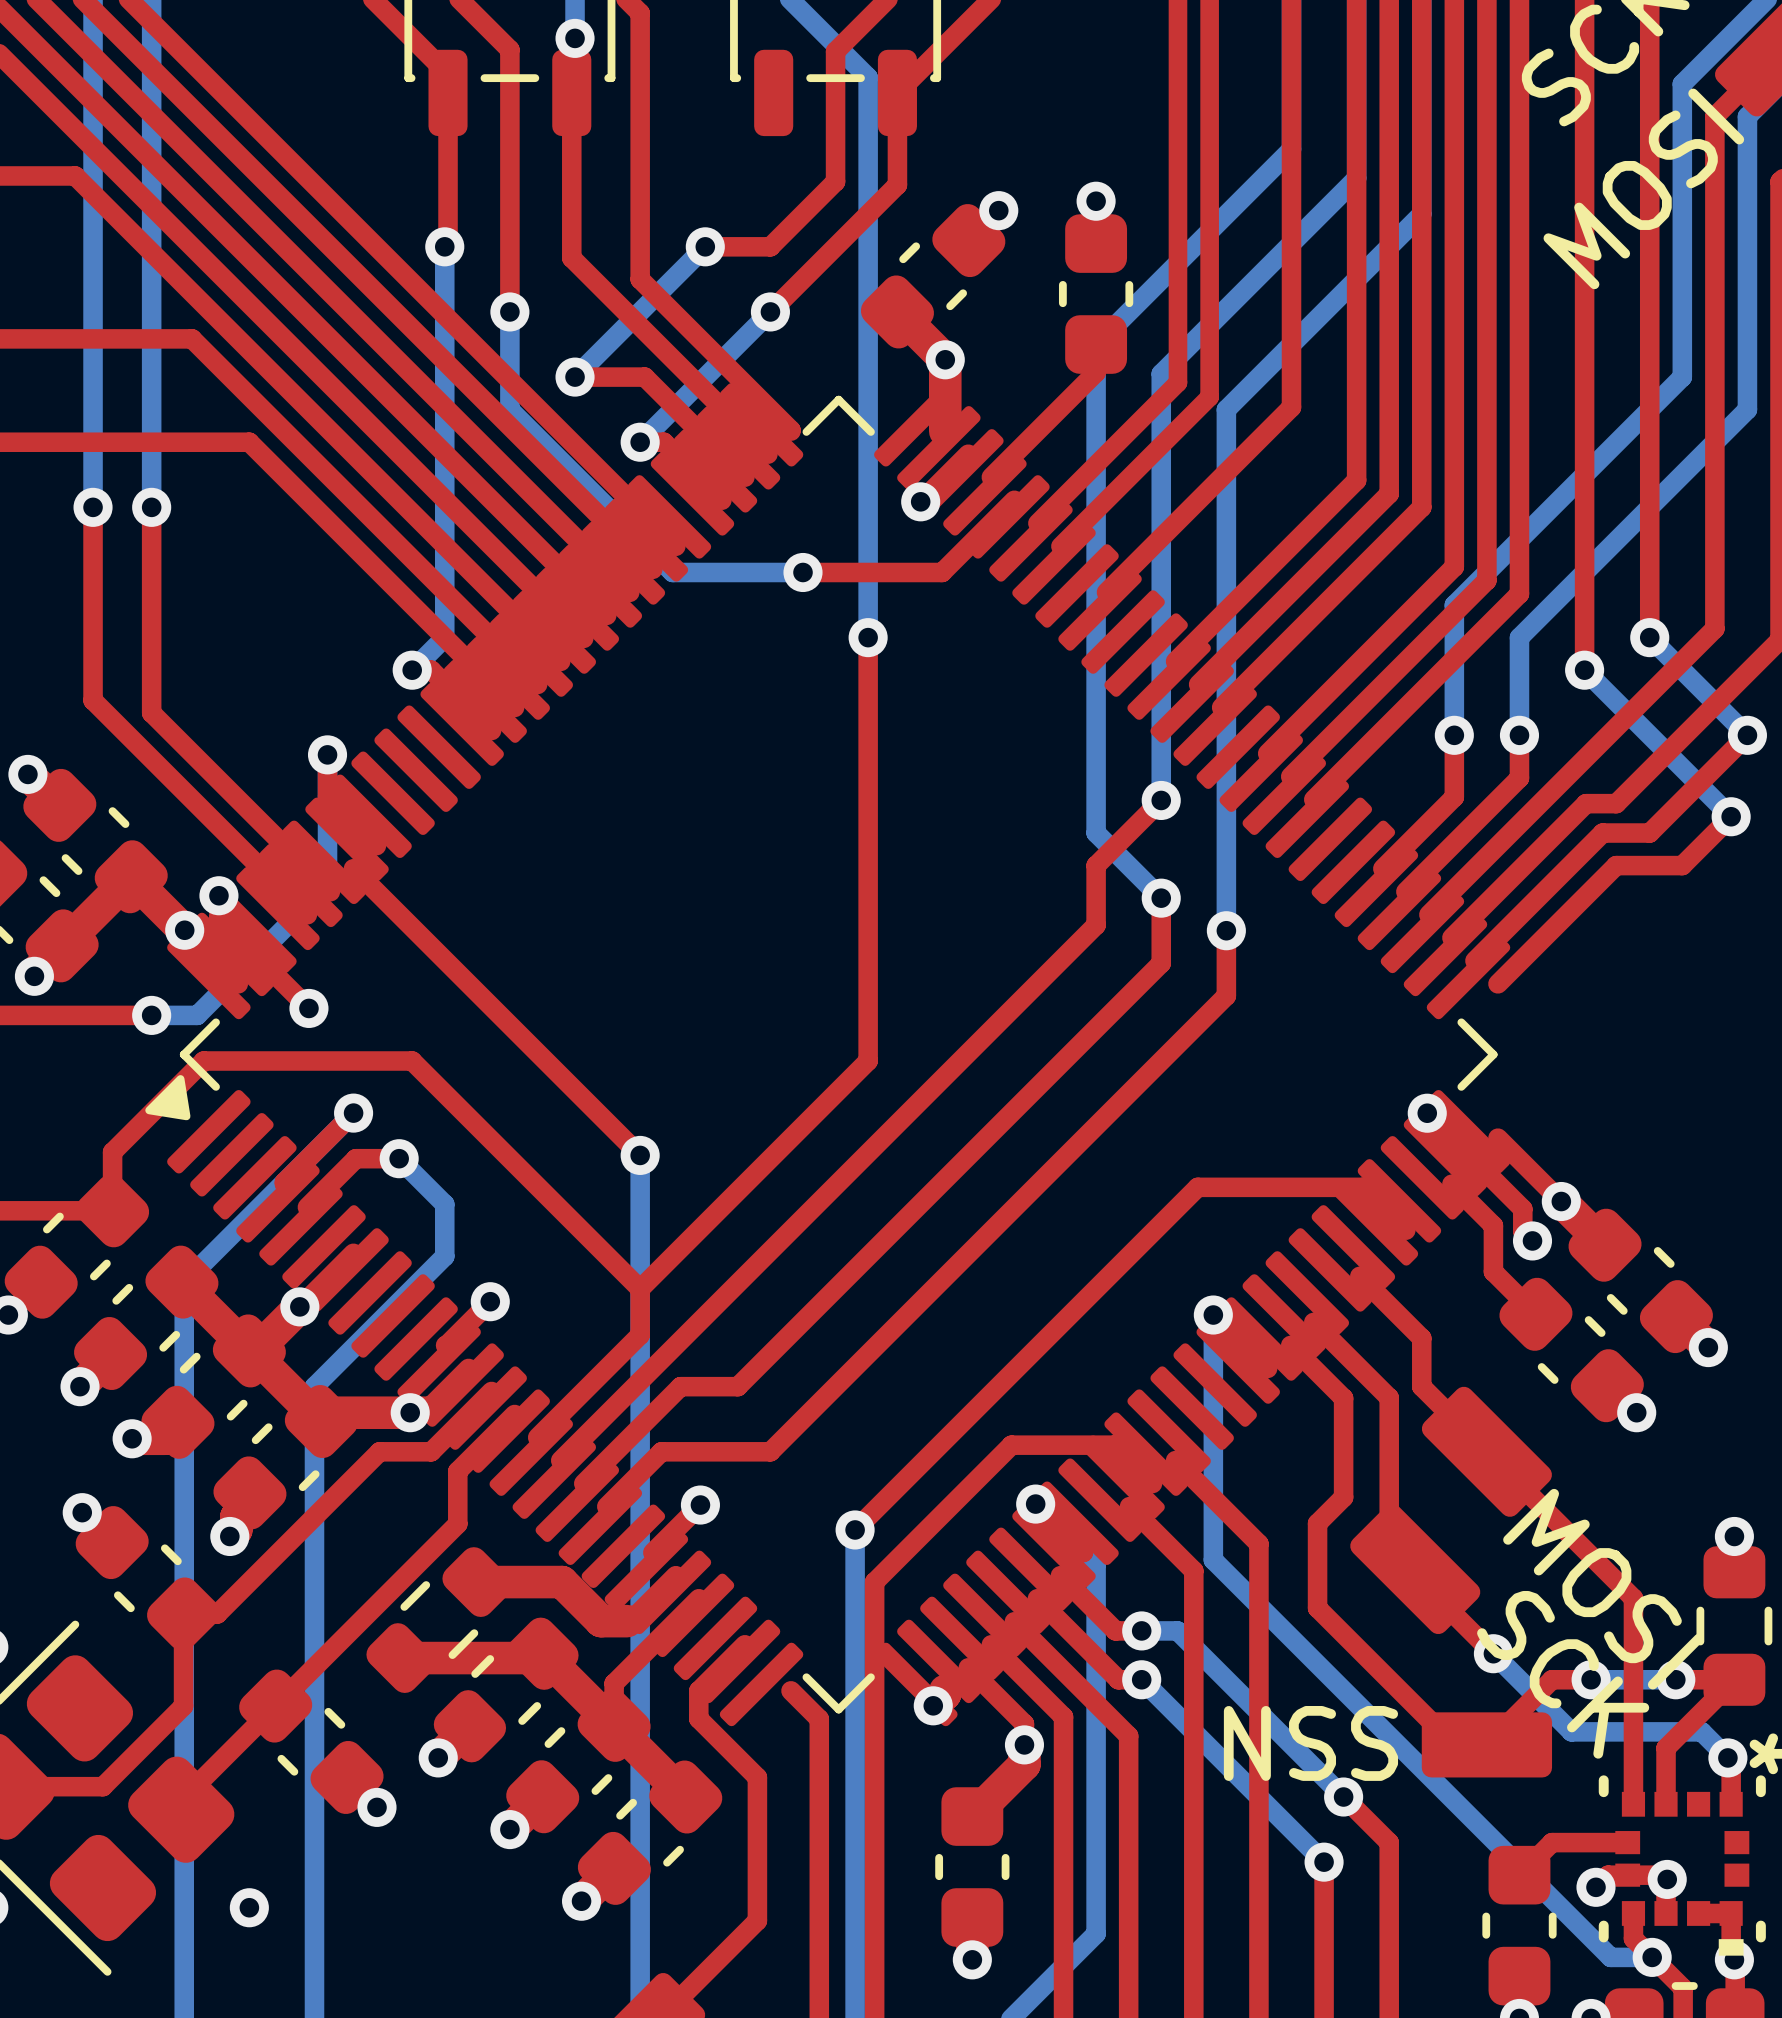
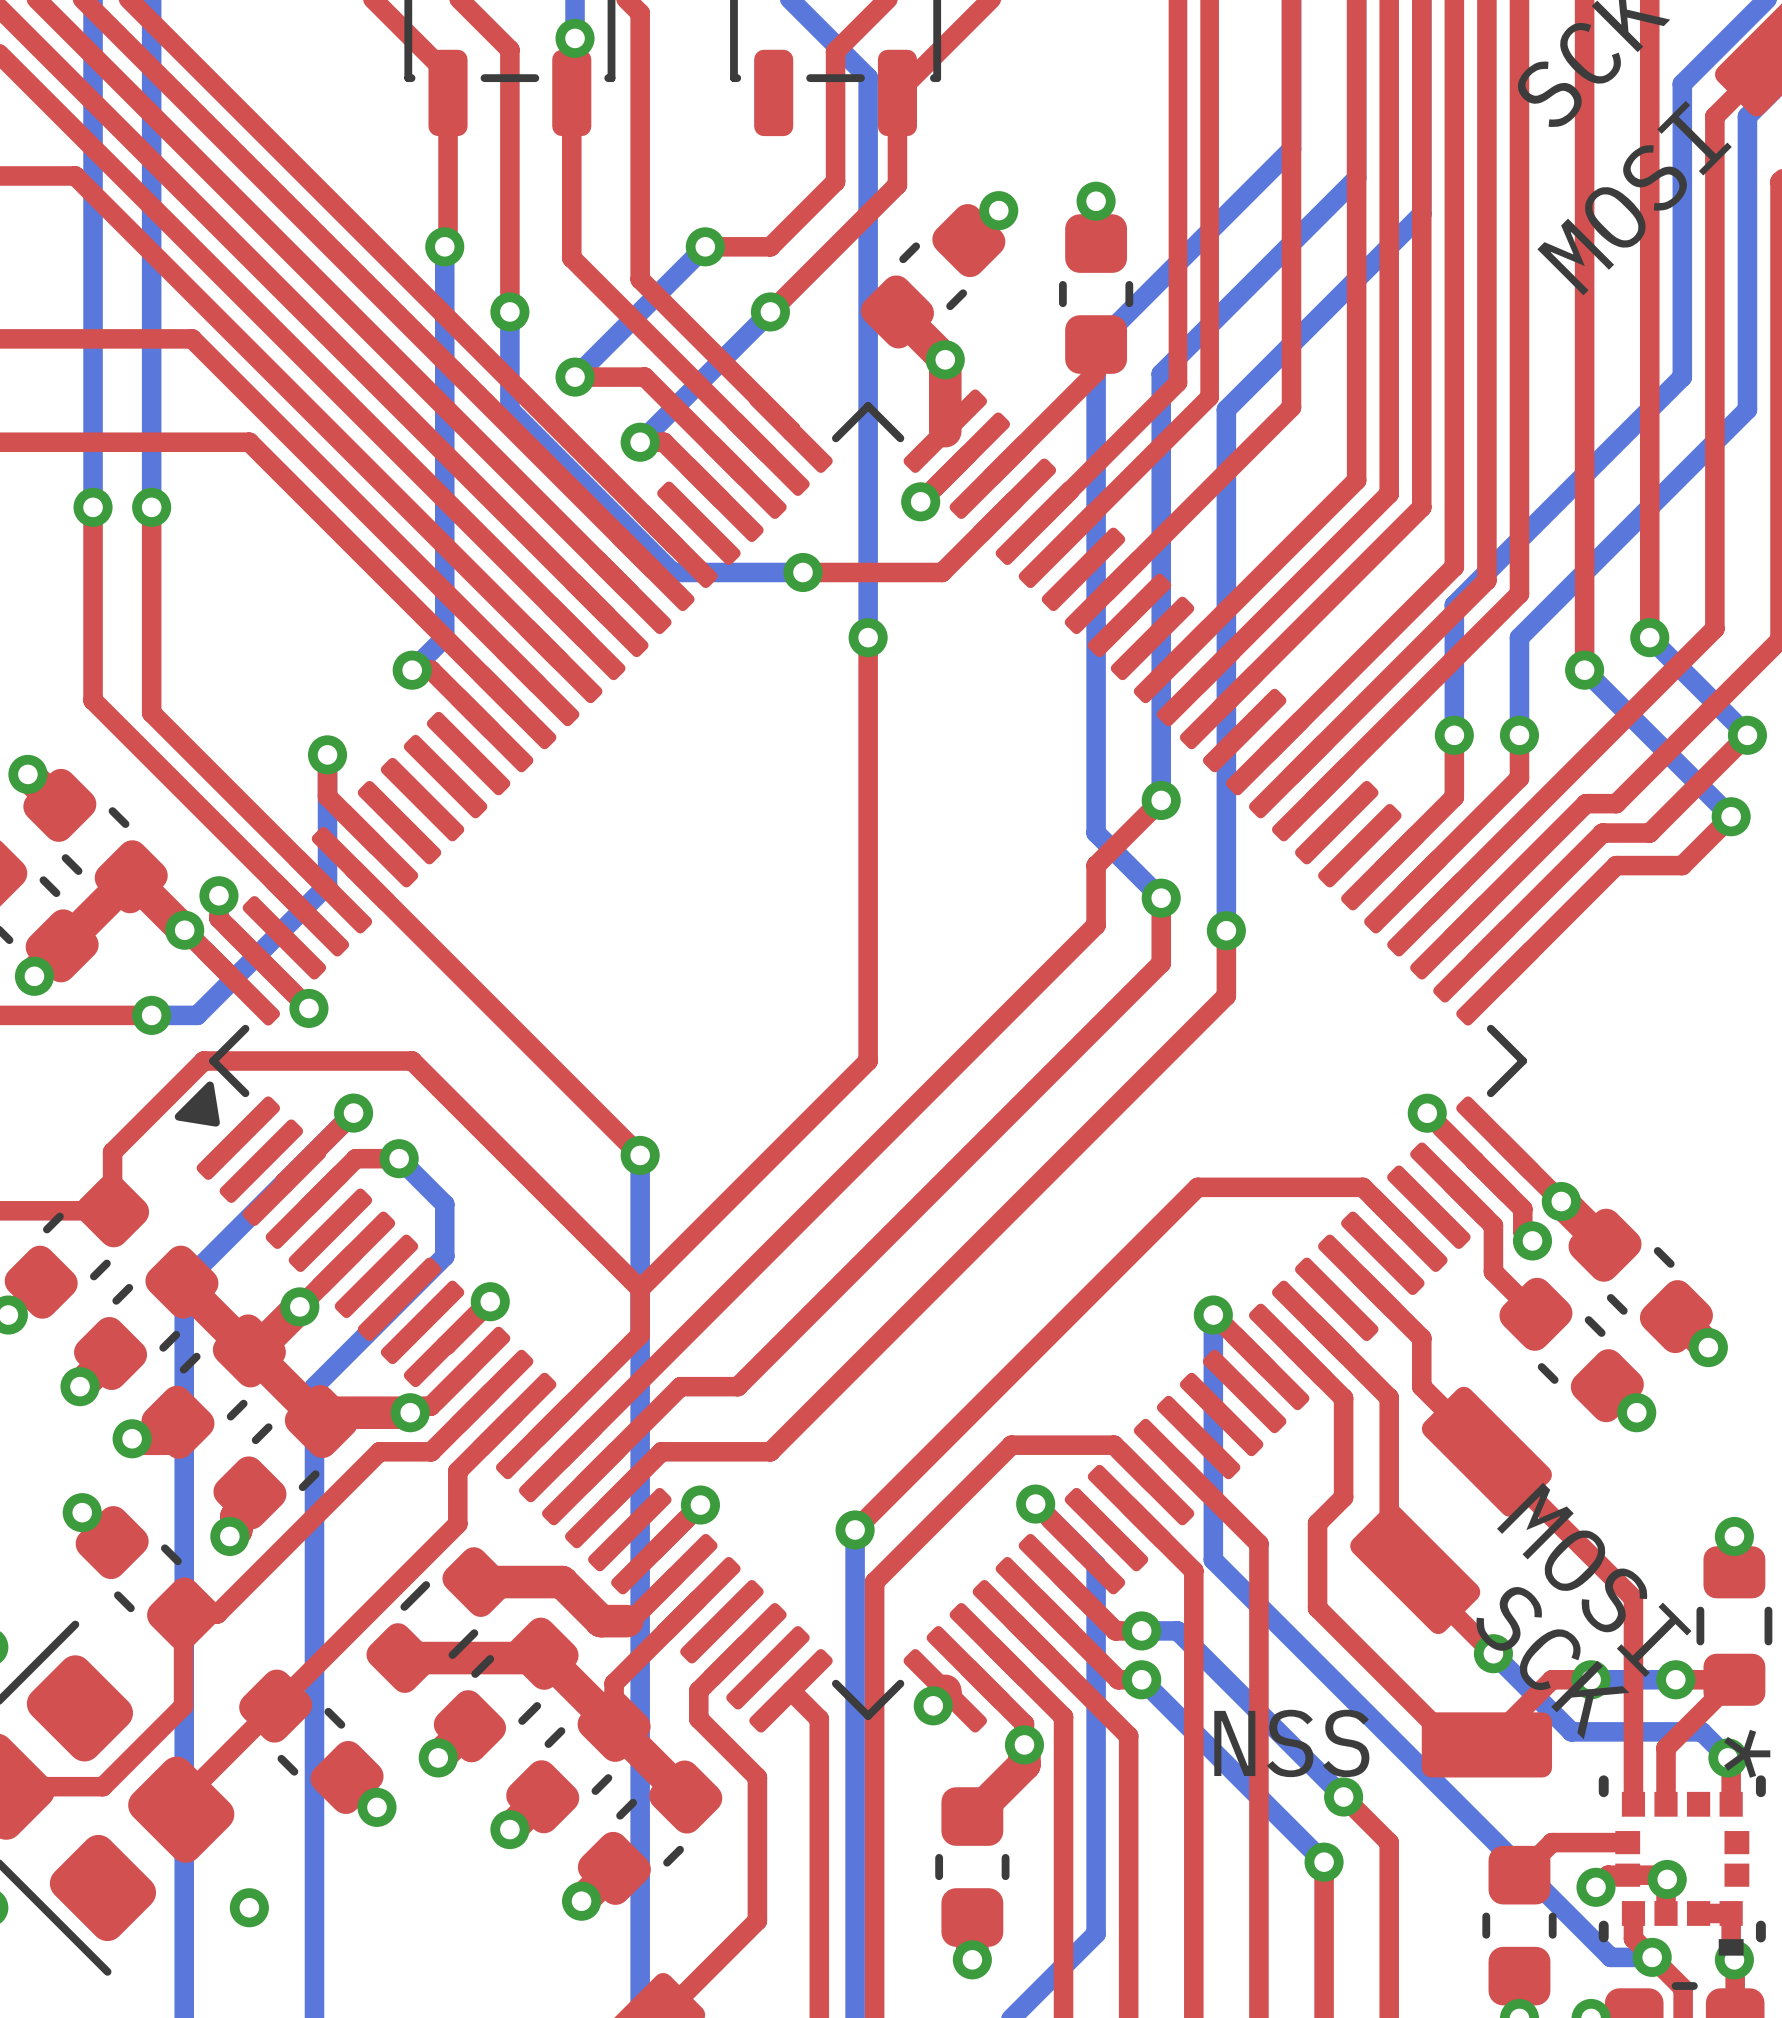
part position: (827, 1054) -> (857, 1061)

